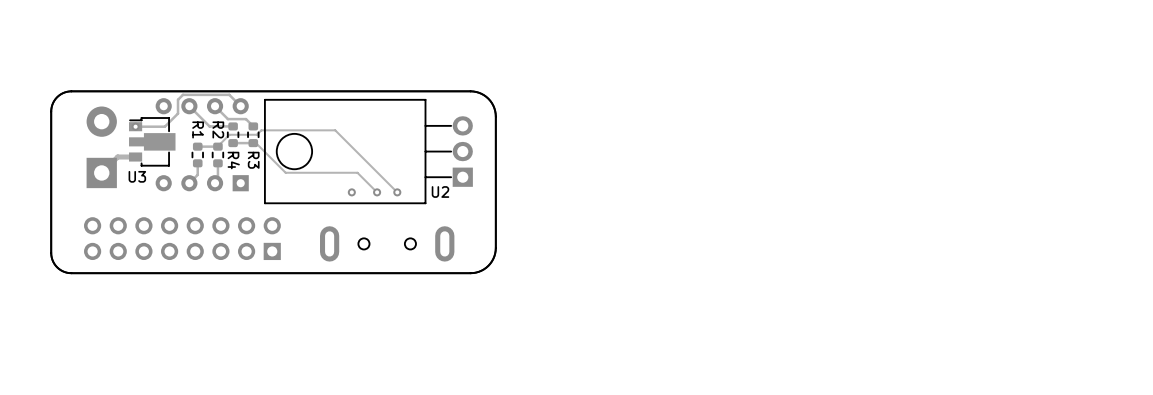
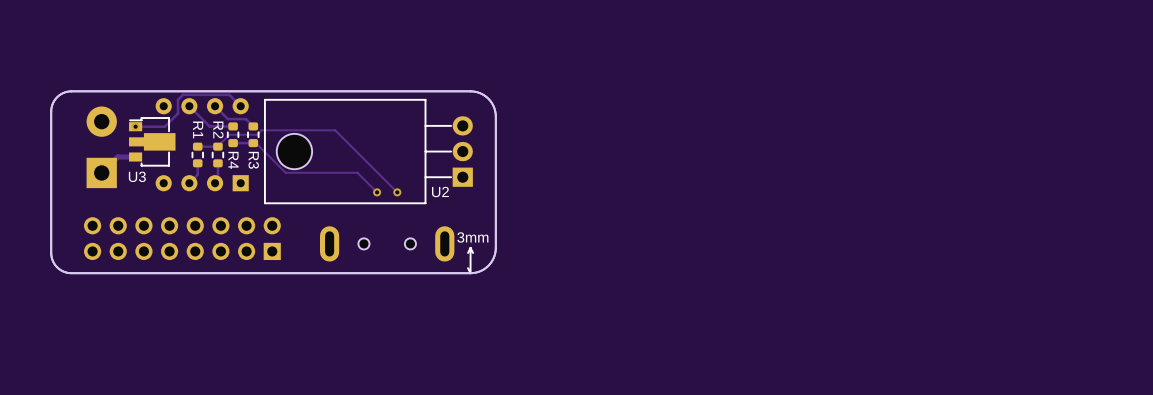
via: (351, 192) -> none
text: none -> 3mm (472, 237)
line: none -> (470, 247) (473, 253)
line: none -> (470, 247) (468, 253)
line: none -> (470, 247) (470, 273) (468, 268)

